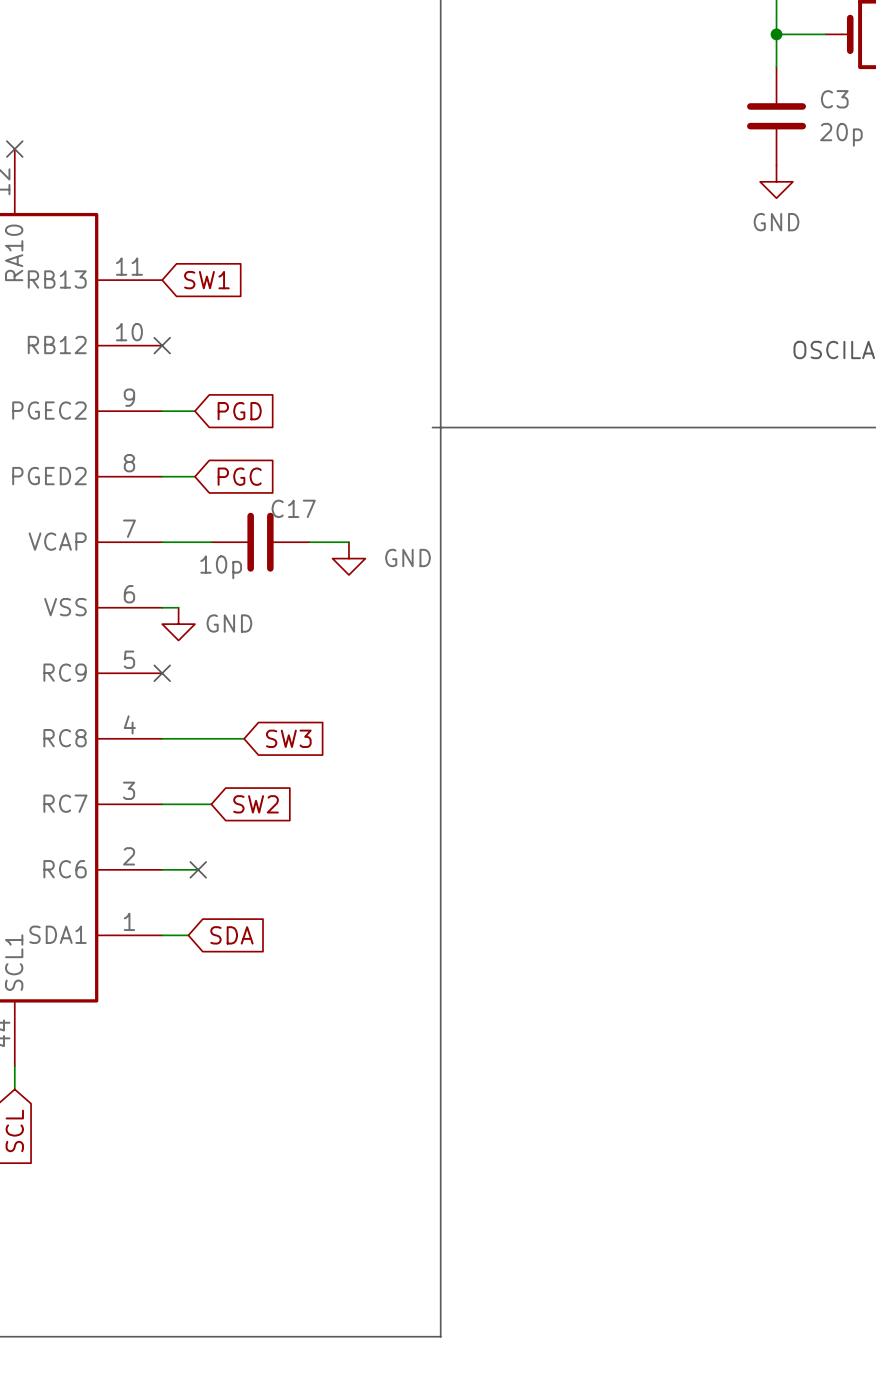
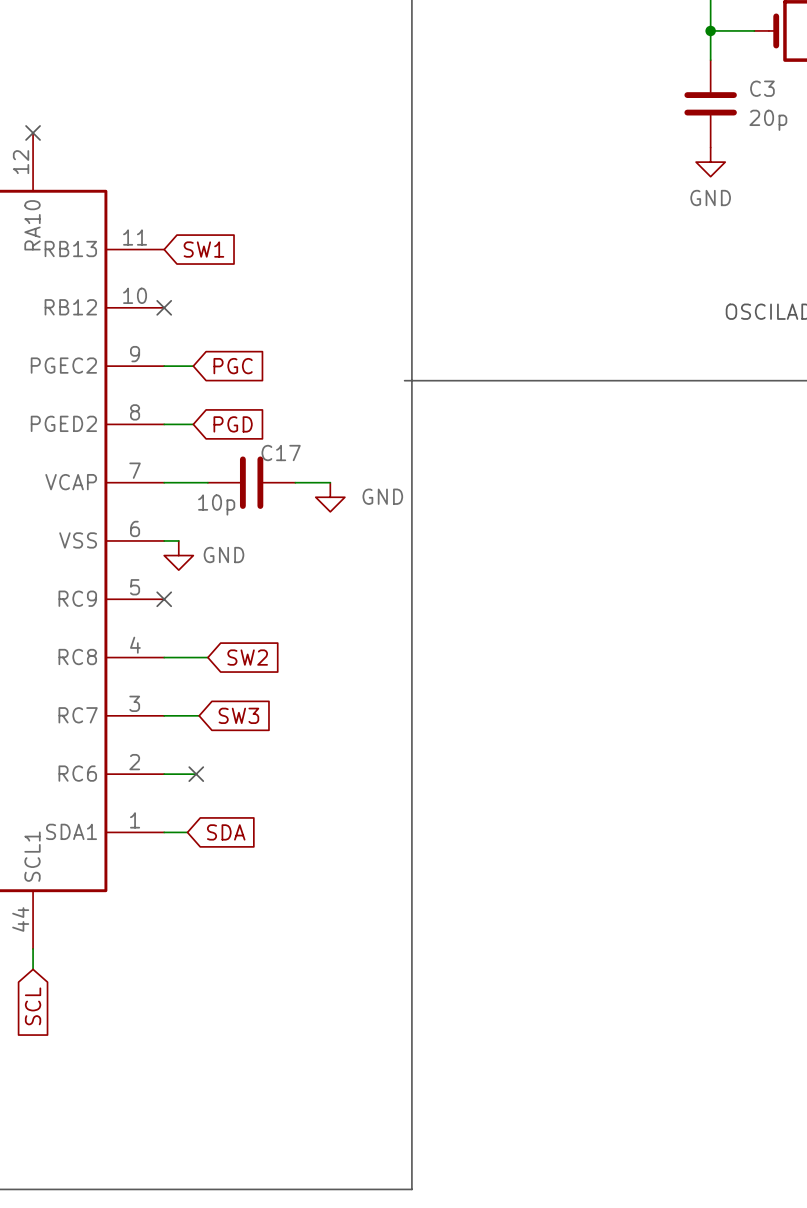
global label: PGD (239, 411) -> PGC (233, 366)
global label: PGC (239, 476) -> PGD (233, 424)
wire: (211, 738) (244, 738) -> none
global label: SW3 (288, 738) -> SW2 (247, 657)
wire: (201, 804) (211, 804) -> none
global label: SW2 (256, 804) -> SW3 (238, 715)

